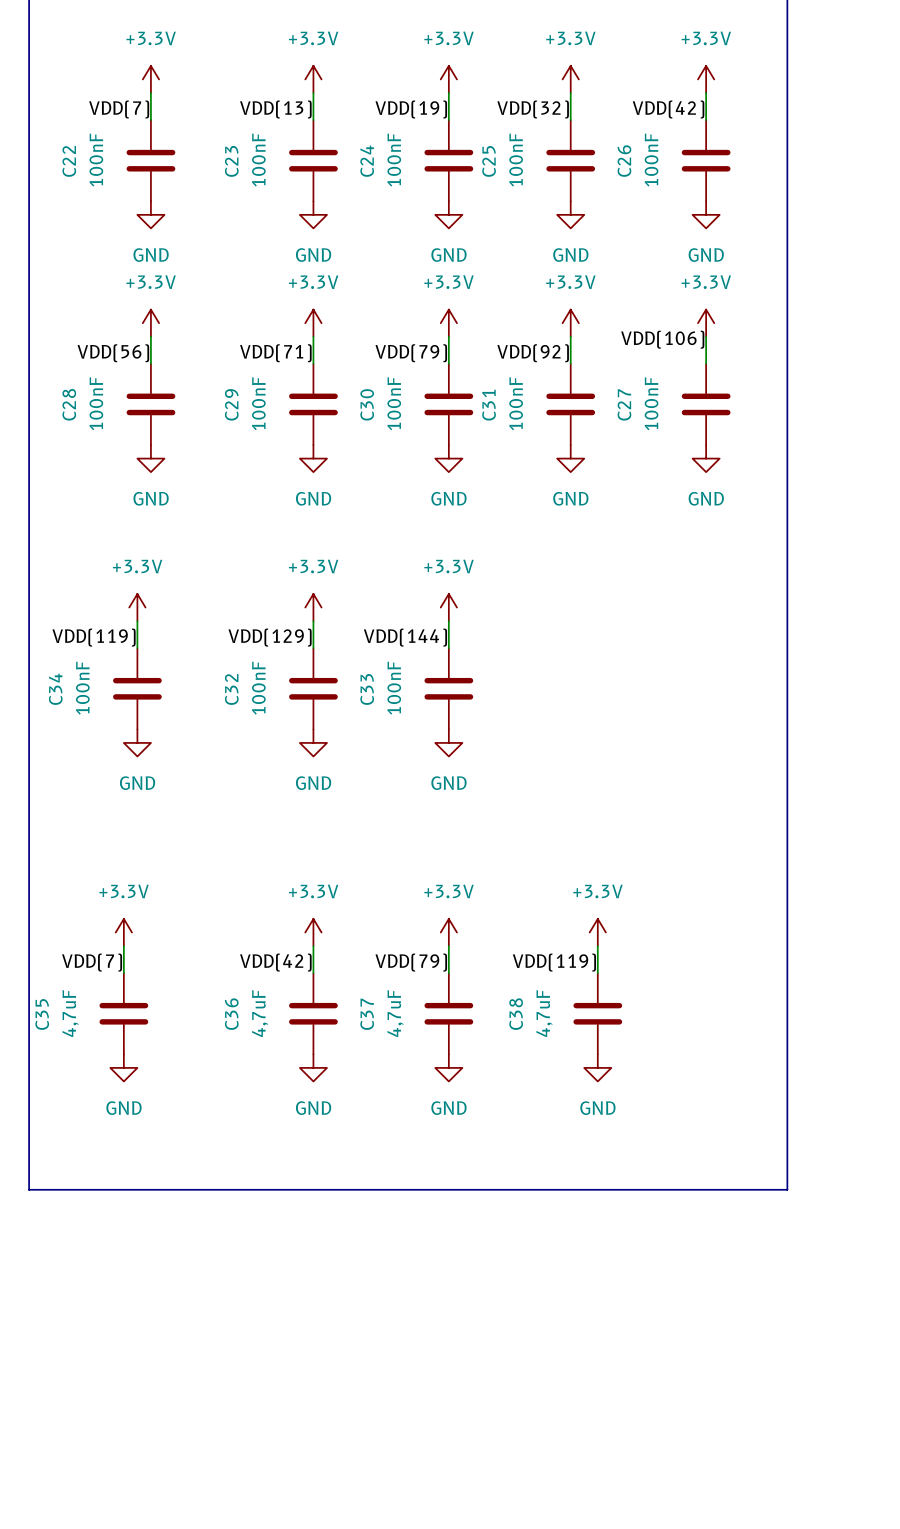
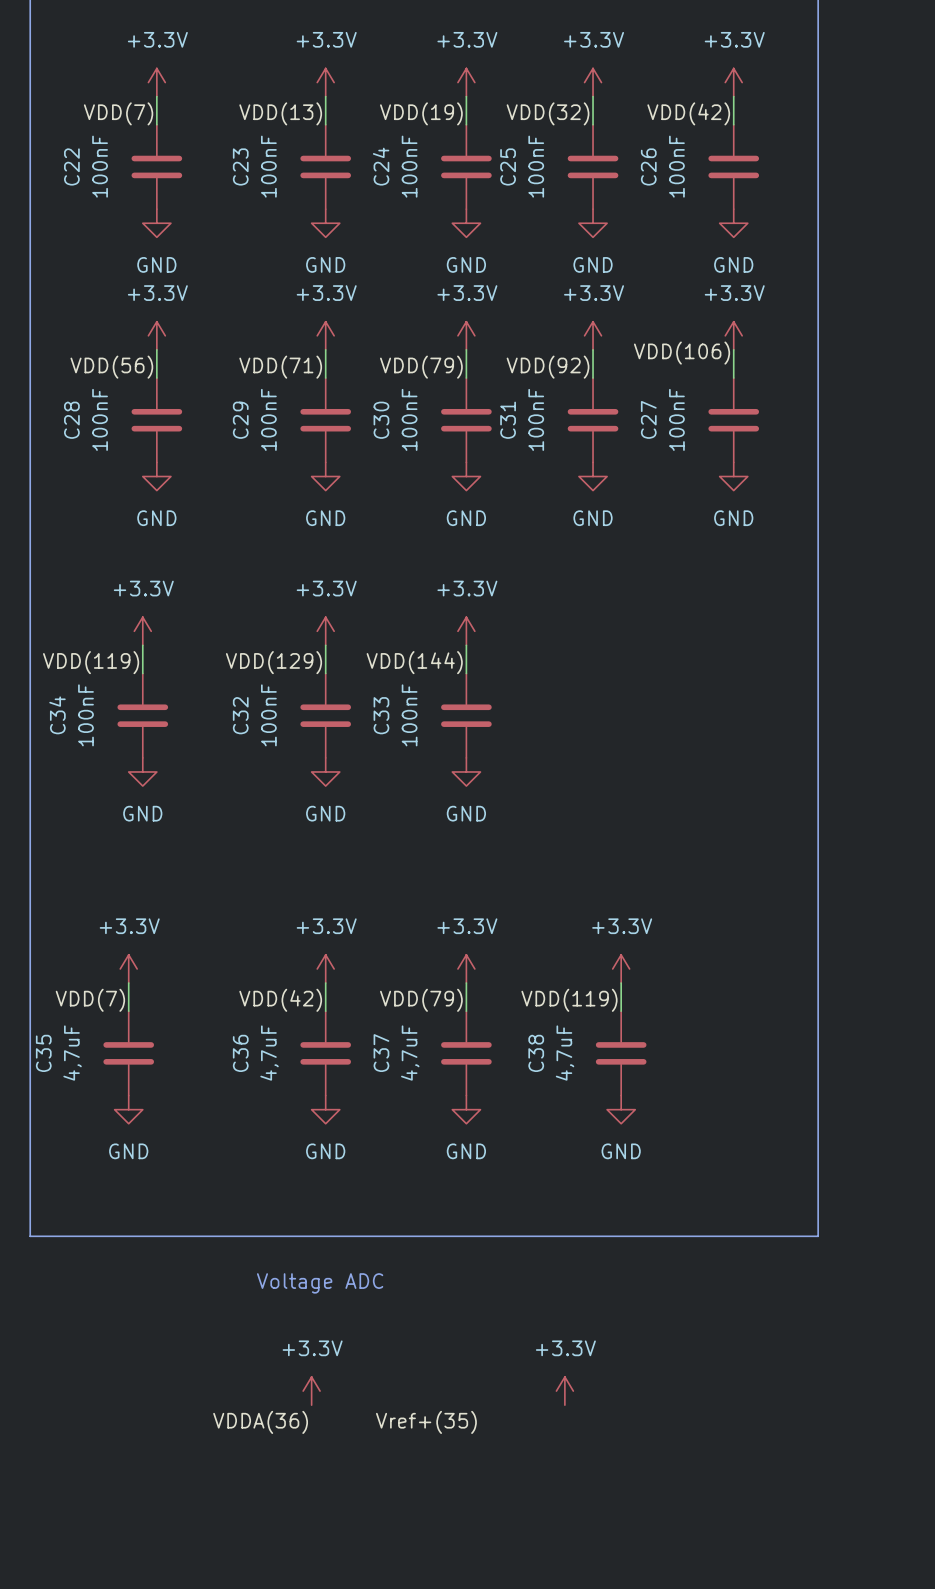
text: none -> Voltage ADC (320, 1283)
power symbol: none -> +3.3V (311, 1391)
power symbol: none -> +3.3V (564, 1391)
label: none -> VDDA(36) (260, 1422)
label: none -> Vref+(35) (426, 1422)

